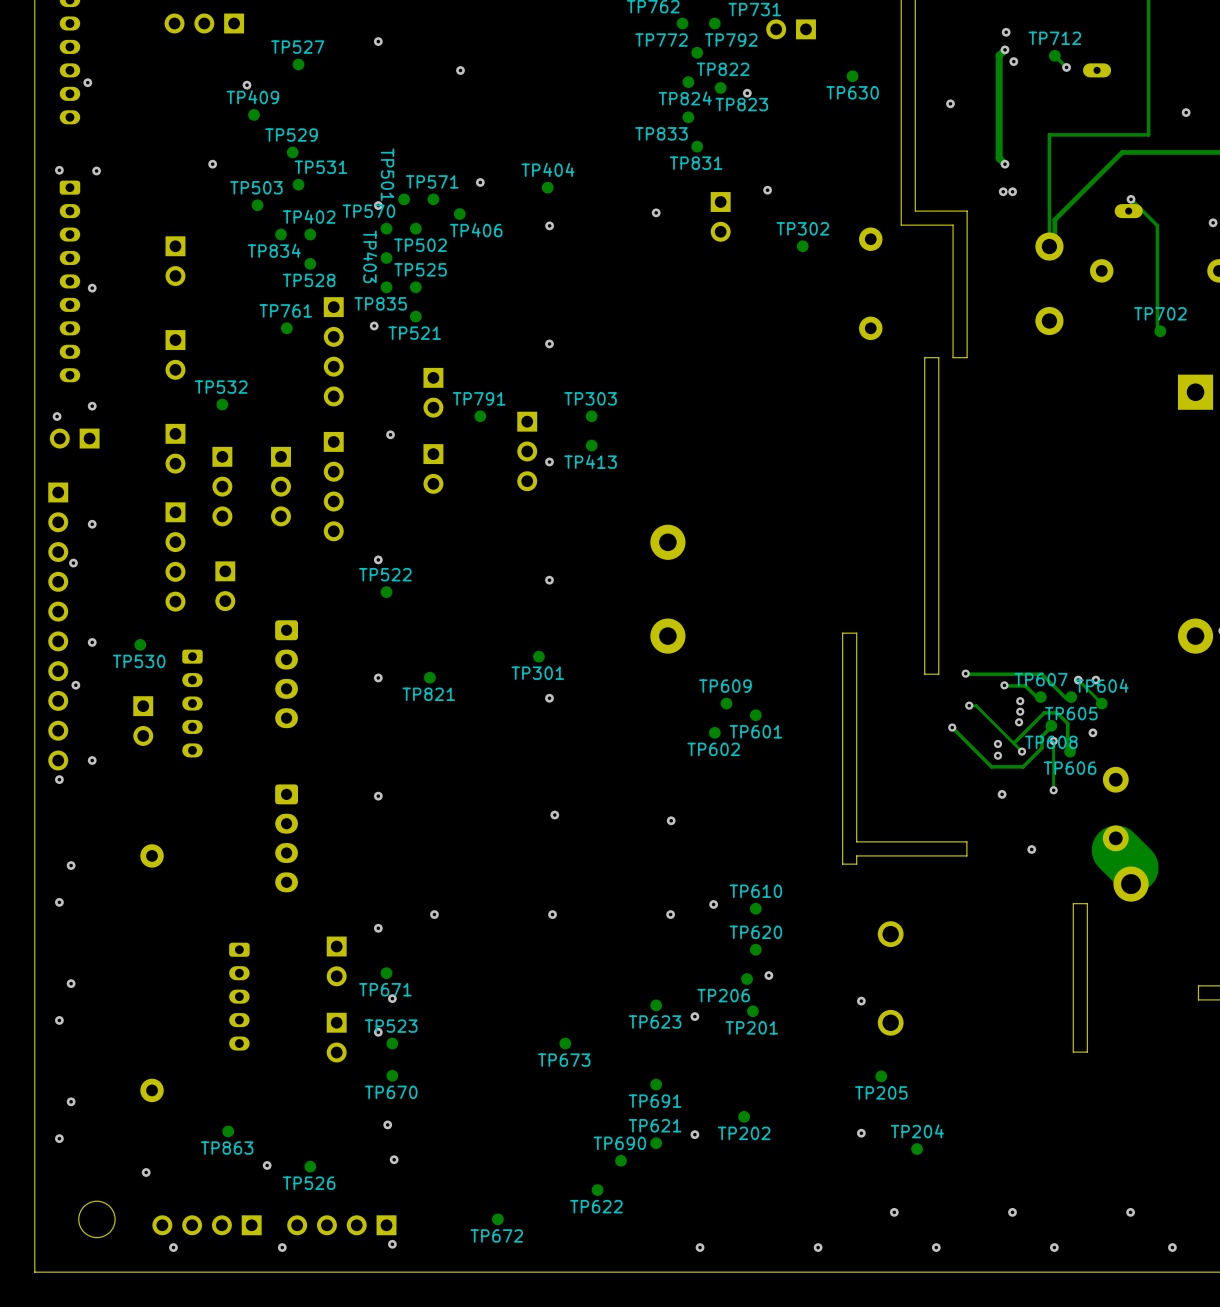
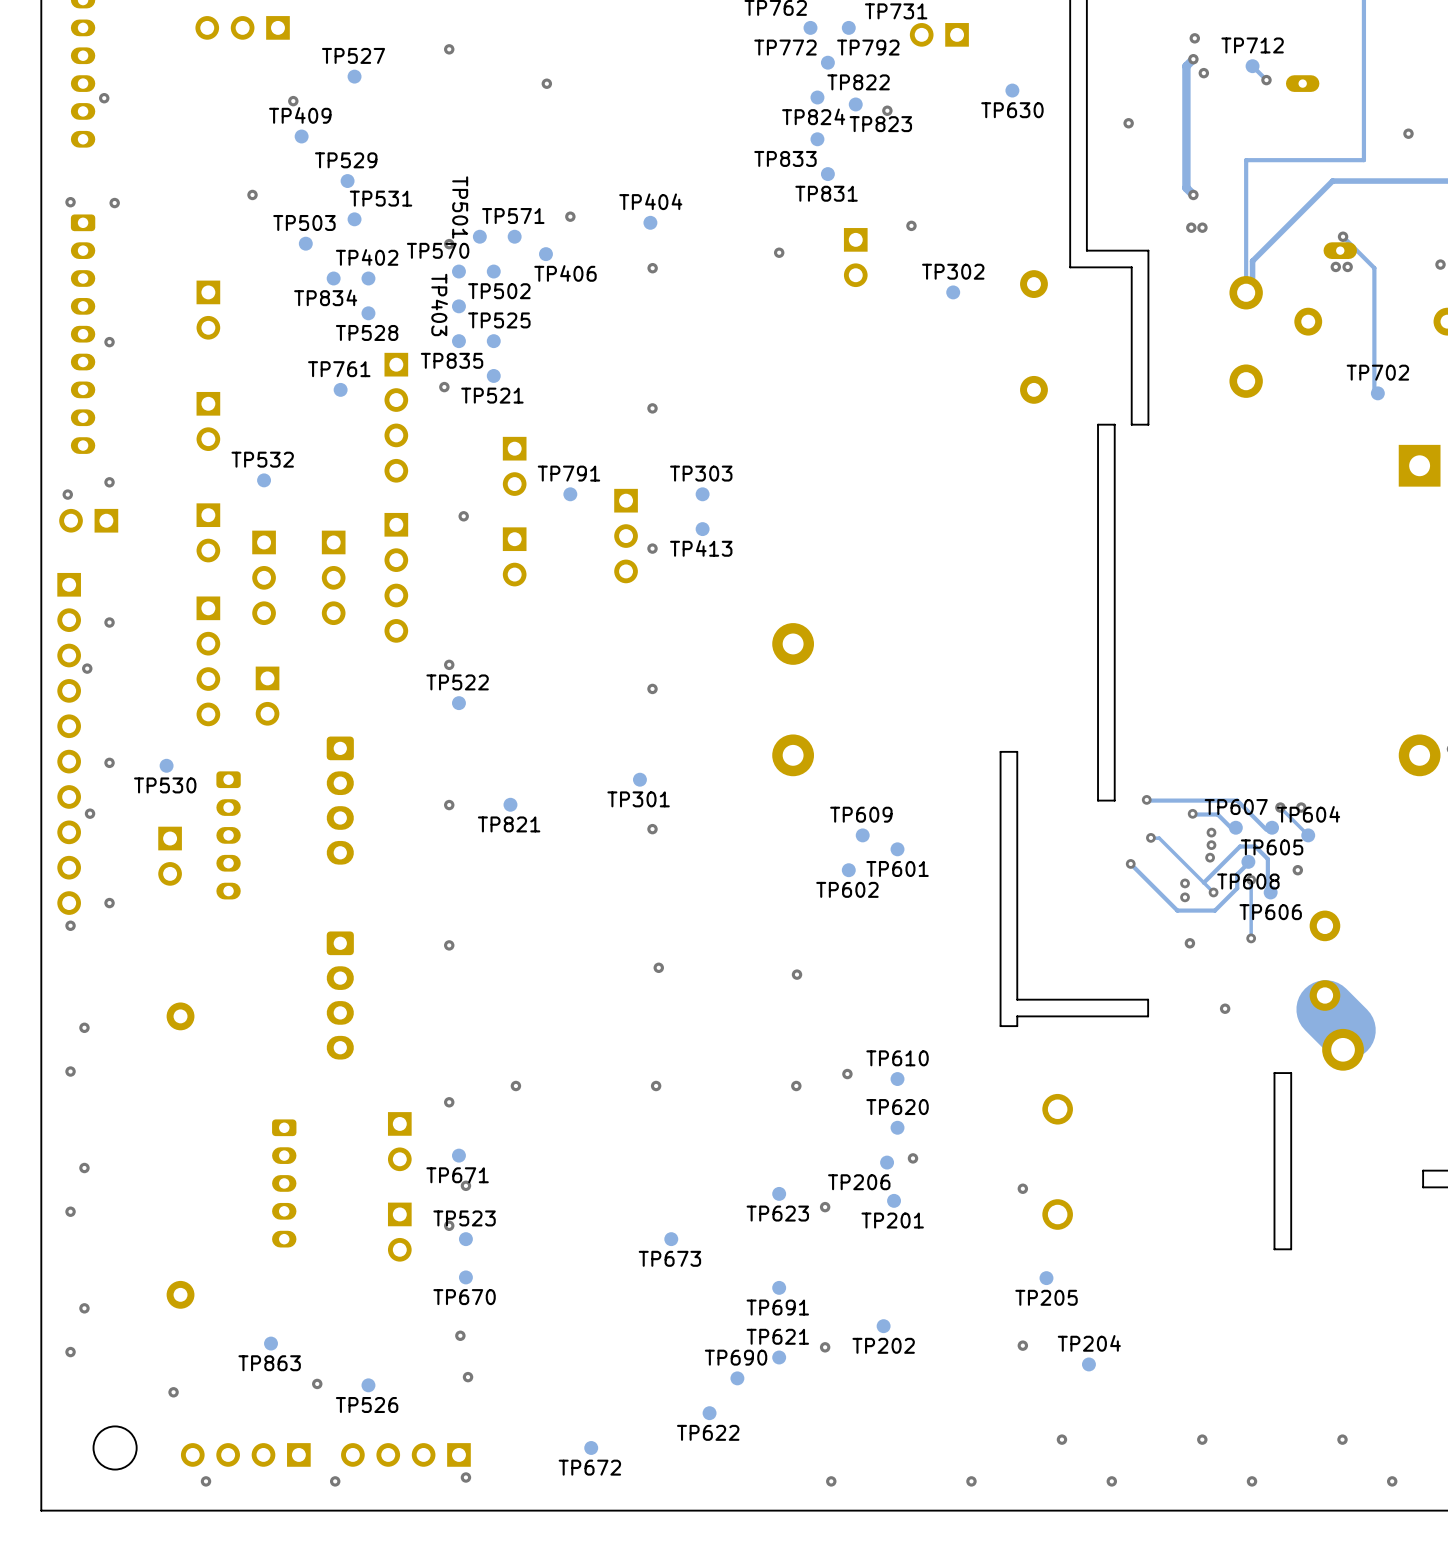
via: none -> (1335, 266)
via: none -> (1347, 266)

